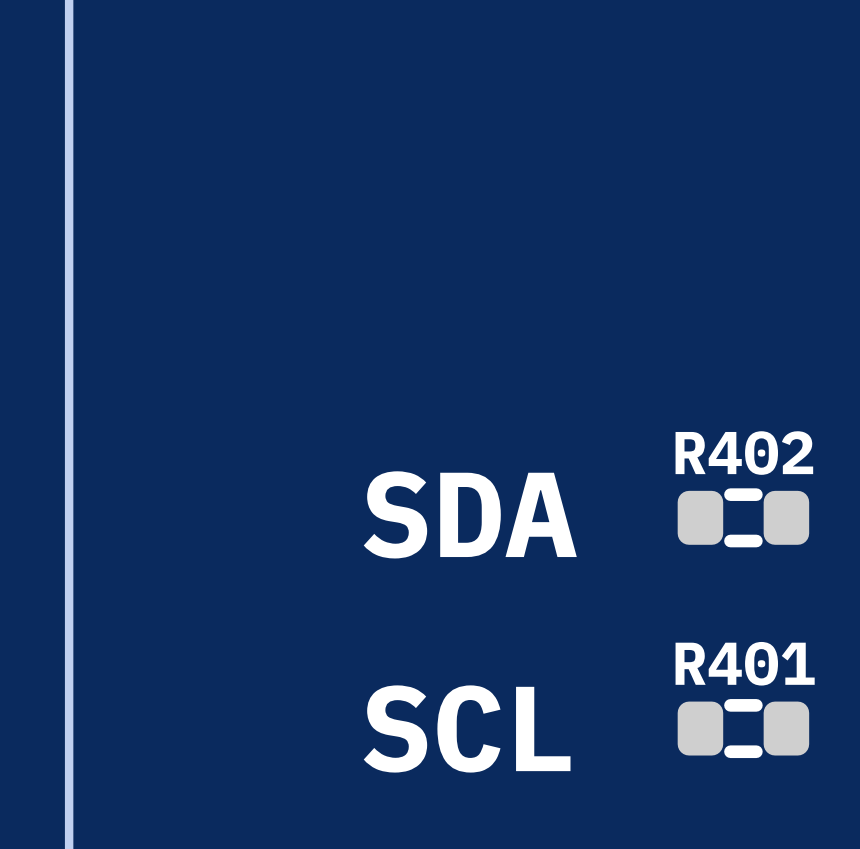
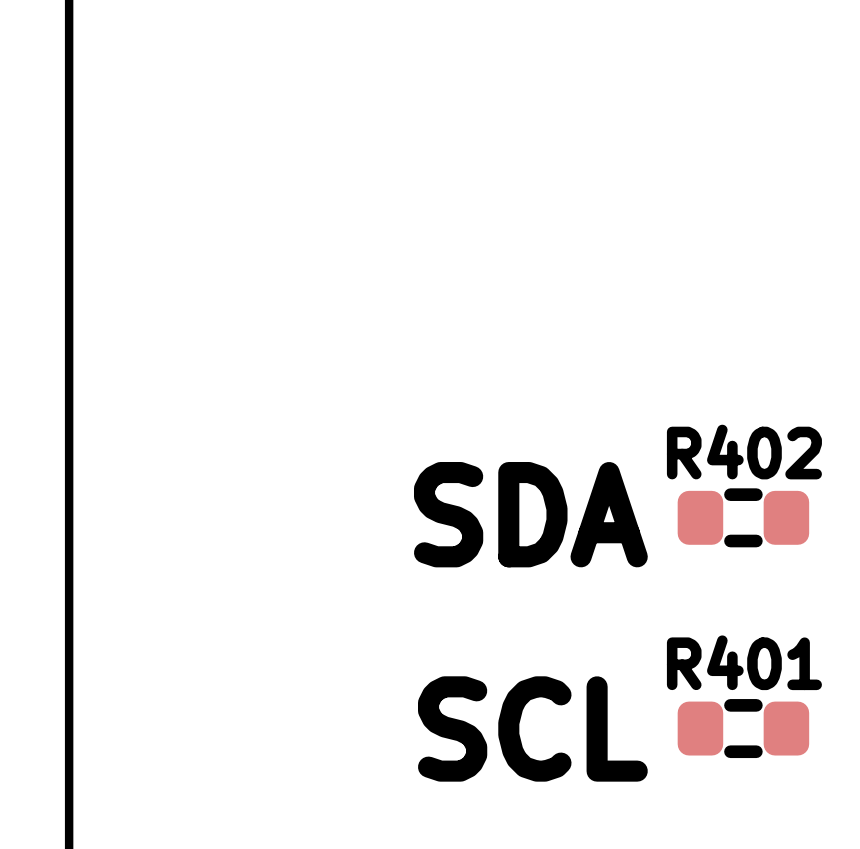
text position: SDA (470, 514) -> SDA (530, 514)
text position: SCL (467, 728) -> SCL (532, 728)

